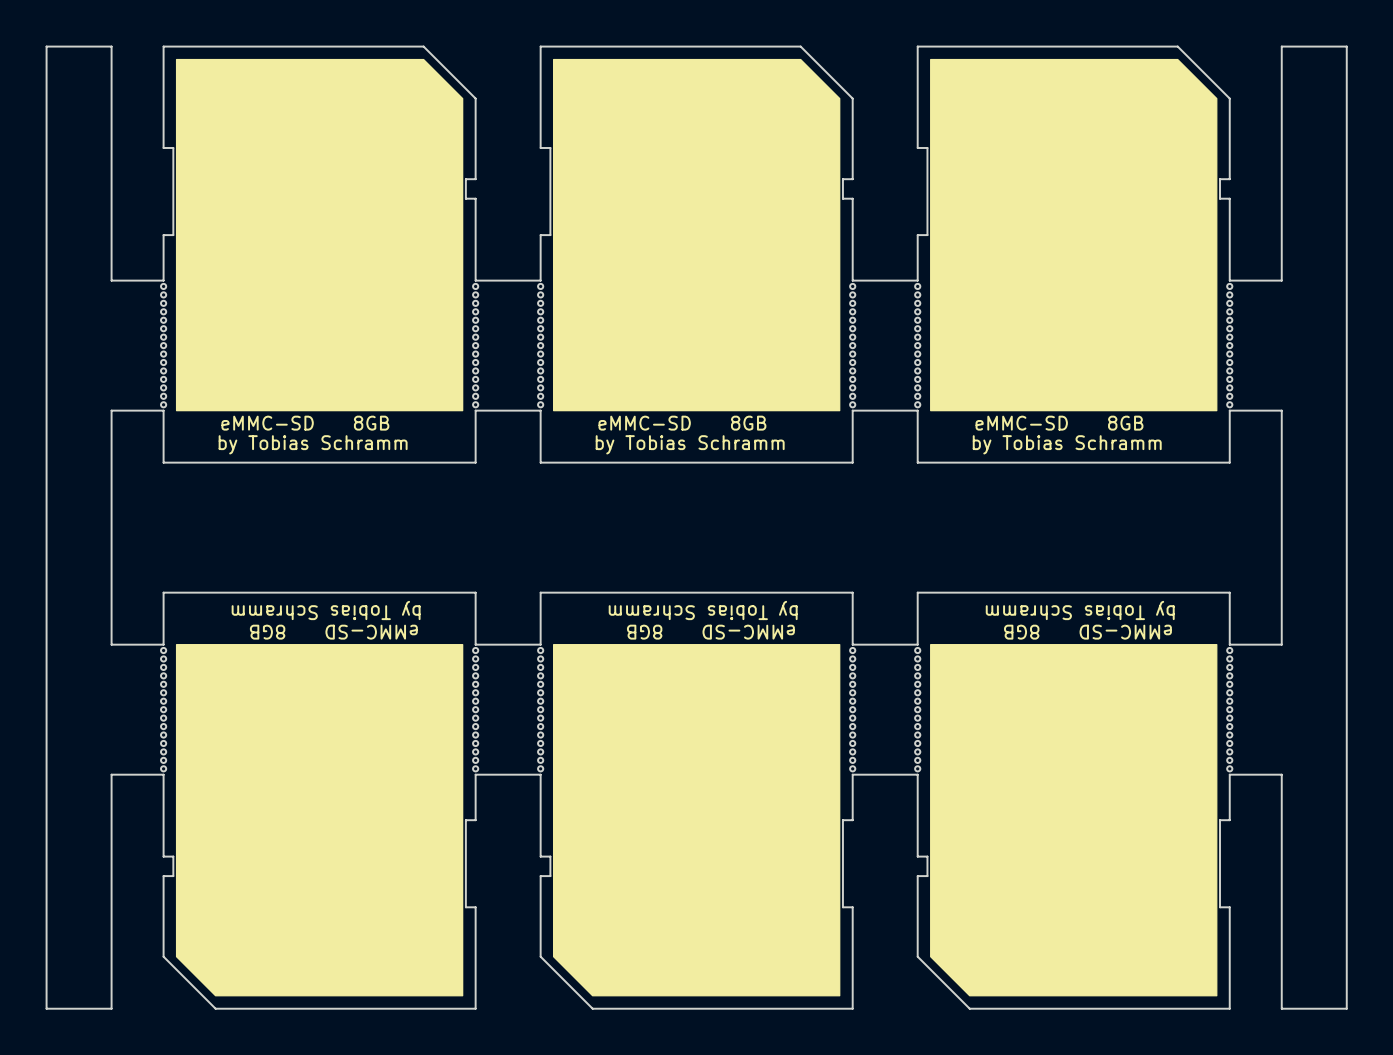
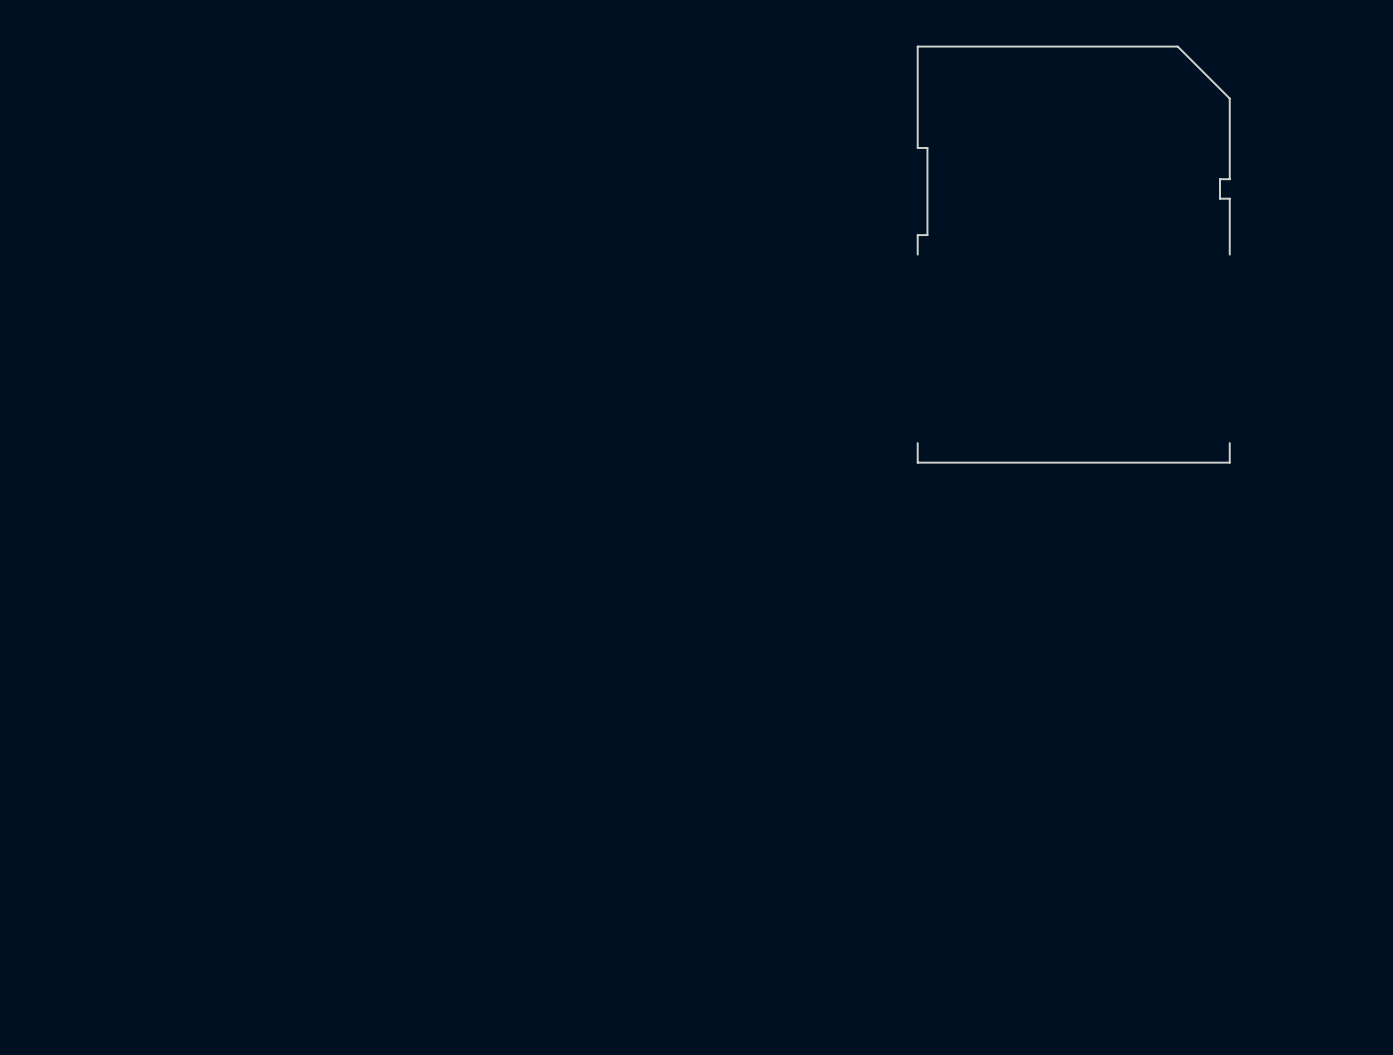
drawing: [175, 58, 464, 412] -> none
drawing: [553, 58, 841, 412] -> none
drawing: [930, 58, 1218, 412] -> none
part: (319, 140) -> none
part: (696, 140) -> none
board edge: (475, 198) (475, 280) (540, 280) (540, 235) -> none
board edge: (852, 198) (852, 280) (917, 280) (917, 254) -> none
board edge: (163, 235) (163, 280) (111, 280) (111, 46) (46, 46) (46, 1008) (111, 1008) (111, 774) (163, 774) (163, 856) -> none
board edge: (1229, 254) (1229, 280) (1281, 280) (1281, 46) (1346, 46) (1346, 1008) (1281, 1008) (1281, 774) (1229, 774) (1229, 820) -> none
part: (163, 286) -> none
part: (475, 286) -> none
part: (540, 286) -> none
part: (852, 286) -> none
part: (917, 286) -> none
part: (1229, 286) -> none
part: (163, 294) -> none
part: (475, 294) -> none
part: (540, 294) -> none
part: (852, 294) -> none
part: (917, 294) -> none
part: (1229, 294) -> none
part: (163, 303) -> none
part: (475, 303) -> none
part: (540, 303) -> none
part: (852, 303) -> none
part: (917, 303) -> none
part: (1229, 303) -> none
part: (163, 311) -> none
part: (475, 311) -> none
part: (540, 311) -> none
part: (852, 311) -> none
part: (917, 311) -> none
part: (1229, 311) -> none
part: (163, 320) -> none
part: (475, 320) -> none
part: (540, 320) -> none
part: (852, 320) -> none
part: (917, 320) -> none
part: (1229, 320) -> none
part: (163, 328) -> none
part: (475, 328) -> none
part: (540, 328) -> none
part: (852, 328) -> none
part: (917, 328) -> none
part: (1229, 328) -> none
part: (163, 337) -> none
part: (475, 337) -> none
part: (540, 337) -> none
part: (852, 337) -> none
part: (917, 337) -> none
part: (1229, 337) -> none
part: (163, 345) -> none
part: (475, 345) -> none
part: (540, 345) -> none
part: (852, 345) -> none
part: (917, 345) -> none
part: (1229, 345) -> none
part: (163, 354) -> none
part: (475, 354) -> none
part: (540, 354) -> none
part: (852, 354) -> none
part: (917, 354) -> none
part: (1229, 354) -> none
part: (163, 362) -> none
part: (475, 362) -> none
part: (540, 362) -> none
part: (852, 362) -> none
part: (917, 362) -> none
part: (1229, 362) -> none
part: (163, 370) -> none
part: (475, 370) -> none
part: (540, 370) -> none
part: (852, 370) -> none
part: (917, 370) -> none
part: (1229, 370) -> none
part: (163, 379) -> none
part: (475, 379) -> none
part: (540, 379) -> none
part: (852, 379) -> none
part: (917, 379) -> none
part: (1229, 379) -> none
part: (163, 387) -> none
part: (475, 387) -> none
part: (540, 387) -> none
part: (852, 387) -> none
part: (917, 387) -> none
part: (1229, 387) -> none
part: (163, 396) -> none
part: (475, 396) -> none
part: (540, 396) -> none
part: (852, 396) -> none
part: (917, 396) -> none
part: (1229, 396) -> none
part: (163, 404) -> none
part: (475, 404) -> none
part: (540, 404) -> none
part: (852, 404) -> none
part: (917, 404) -> none
part: (1229, 404) -> none
text: eMMC-SD (267, 423) -> none
text: 8GB (371, 423) -> none
text: eMMC-SD (644, 423) -> none
text: 8GB (748, 423) -> none
text: eMMC-SD (1021, 423) -> none
text: 8GB (1125, 423) -> none
board edge: (1229, 443) (1229, 410) (1281, 410) (1281, 644) (1229, 644) (1229, 592) (917, 592) (917, 644) (852, 644) (852, 592) (540, 592) (540, 644) (475, 644) (475, 592) (163, 592) (163, 644) (111, 644) (111, 410) (163, 410) (163, 462) (475, 462) (475, 410) (540, 410) (540, 462) (852, 462) (852, 410) (917, 410) (917, 443) -> none
text: by Tobias Schramm (313, 444) -> none
text: by Tobias Schramm (690, 444) -> none
text: by Tobias Schramm (1067, 444) -> none
text: by Tobias Schramm (326, 610) -> none
text: by Tobias Schramm (703, 610) -> none
text: by Tobias Schramm (1080, 610) -> none
text: 8GB (267, 632) -> none
text: eMMC-SD (371, 632) -> none
text: 8GB (644, 632) -> none
text: eMMC-SD (748, 632) -> none
text: 8GB (1021, 632) -> none
text: eMMC-SD (1125, 632) -> none
drawing: [175, 644, 464, 997] -> none
drawing: [553, 644, 841, 997] -> none
drawing: [930, 644, 1218, 997] -> none
part: (163, 650) -> none
part: (475, 650) -> none
part: (540, 650) -> none
part: (852, 650) -> none
part: (917, 650) -> none
part: (1229, 650) -> none
part: (163, 658) -> none
part: (475, 658) -> none
part: (540, 658) -> none
part: (852, 658) -> none
part: (917, 658) -> none
part: (1229, 658) -> none
part: (163, 667) -> none
part: (475, 667) -> none
part: (540, 667) -> none
part: (852, 667) -> none
part: (917, 667) -> none
part: (1229, 667) -> none
part: (163, 675) -> none
part: (475, 675) -> none
part: (540, 675) -> none
part: (852, 675) -> none
part: (917, 675) -> none
part: (1229, 675) -> none
part: (163, 684) -> none
part: (475, 684) -> none
part: (540, 684) -> none
part: (852, 684) -> none
part: (917, 684) -> none
part: (1229, 684) -> none
part: (163, 692) -> none
part: (475, 692) -> none
part: (540, 692) -> none
part: (852, 692) -> none
part: (917, 692) -> none
part: (1229, 692) -> none
part: (163, 701) -> none
part: (475, 701) -> none
part: (540, 701) -> none
part: (852, 701) -> none
part: (917, 701) -> none
part: (1229, 701) -> none
part: (163, 709) -> none
part: (475, 709) -> none
part: (540, 709) -> none
part: (852, 709) -> none
part: (917, 709) -> none
part: (1229, 709) -> none
part: (163, 718) -> none
part: (475, 718) -> none
part: (540, 718) -> none
part: (852, 718) -> none
part: (917, 718) -> none
part: (1229, 718) -> none
part: (163, 726) -> none
part: (475, 726) -> none
part: (540, 726) -> none
part: (852, 726) -> none
part: (917, 726) -> none
part: (1229, 726) -> none
part: (163, 735) -> none
part: (475, 735) -> none
part: (540, 735) -> none
part: (852, 735) -> none
part: (917, 735) -> none
part: (1229, 735) -> none
part: (163, 743) -> none
part: (475, 743) -> none
part: (540, 743) -> none
part: (852, 743) -> none
part: (917, 743) -> none
part: (1229, 743) -> none
part: (163, 751) -> none
part: (475, 751) -> none
part: (540, 751) -> none
part: (852, 751) -> none
part: (917, 751) -> none
part: (1229, 751) -> none
part: (163, 760) -> none
part: (475, 760) -> none
part: (540, 760) -> none
part: (852, 760) -> none
part: (917, 760) -> none
part: (1229, 760) -> none
part: (163, 768) -> none
part: (475, 768) -> none
part: (540, 768) -> none
part: (852, 768) -> none
part: (917, 768) -> none
part: (1229, 768) -> none
board edge: (475, 820) (475, 774) (540, 774) (540, 856) -> none
board edge: (852, 820) (852, 774) (917, 774) (917, 856) -> none
part: (319, 914) -> none
part: (696, 914) -> none
part: (1073, 914) -> none

